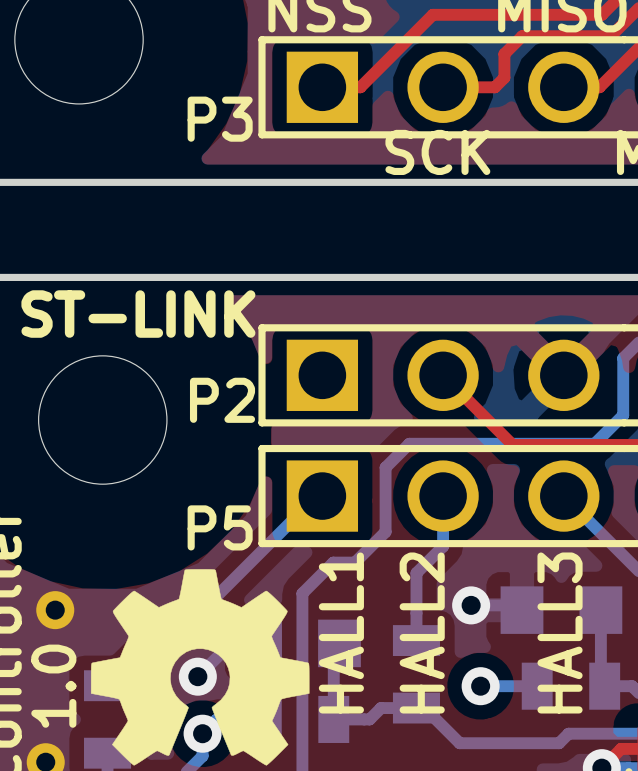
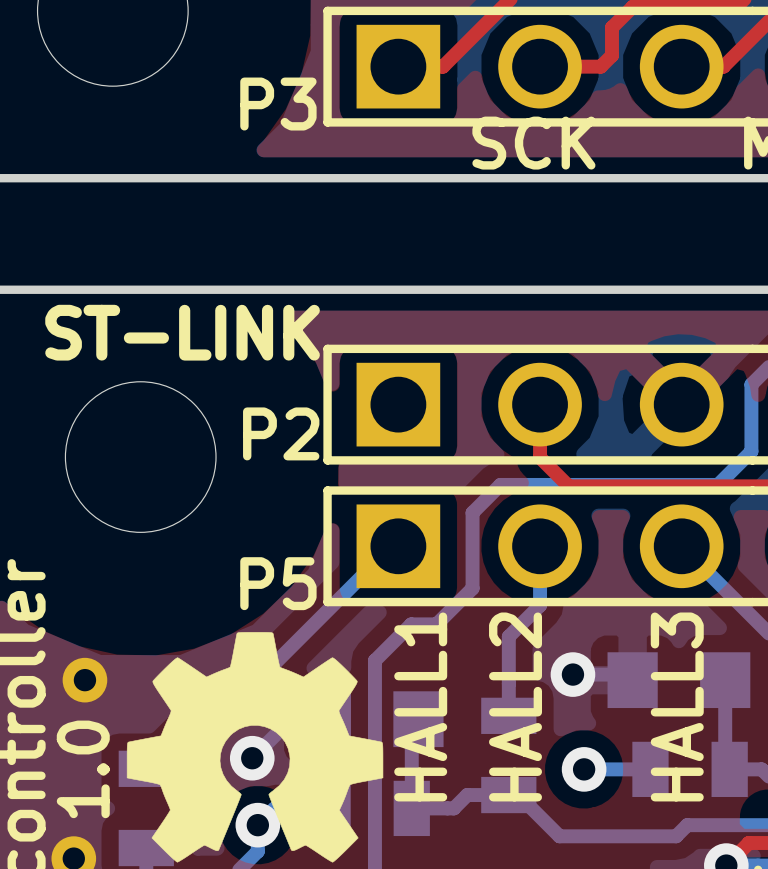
top track: (443, 375) (512, 444) -> (540, 404) (540, 457) (568, 486) (621, 486)

